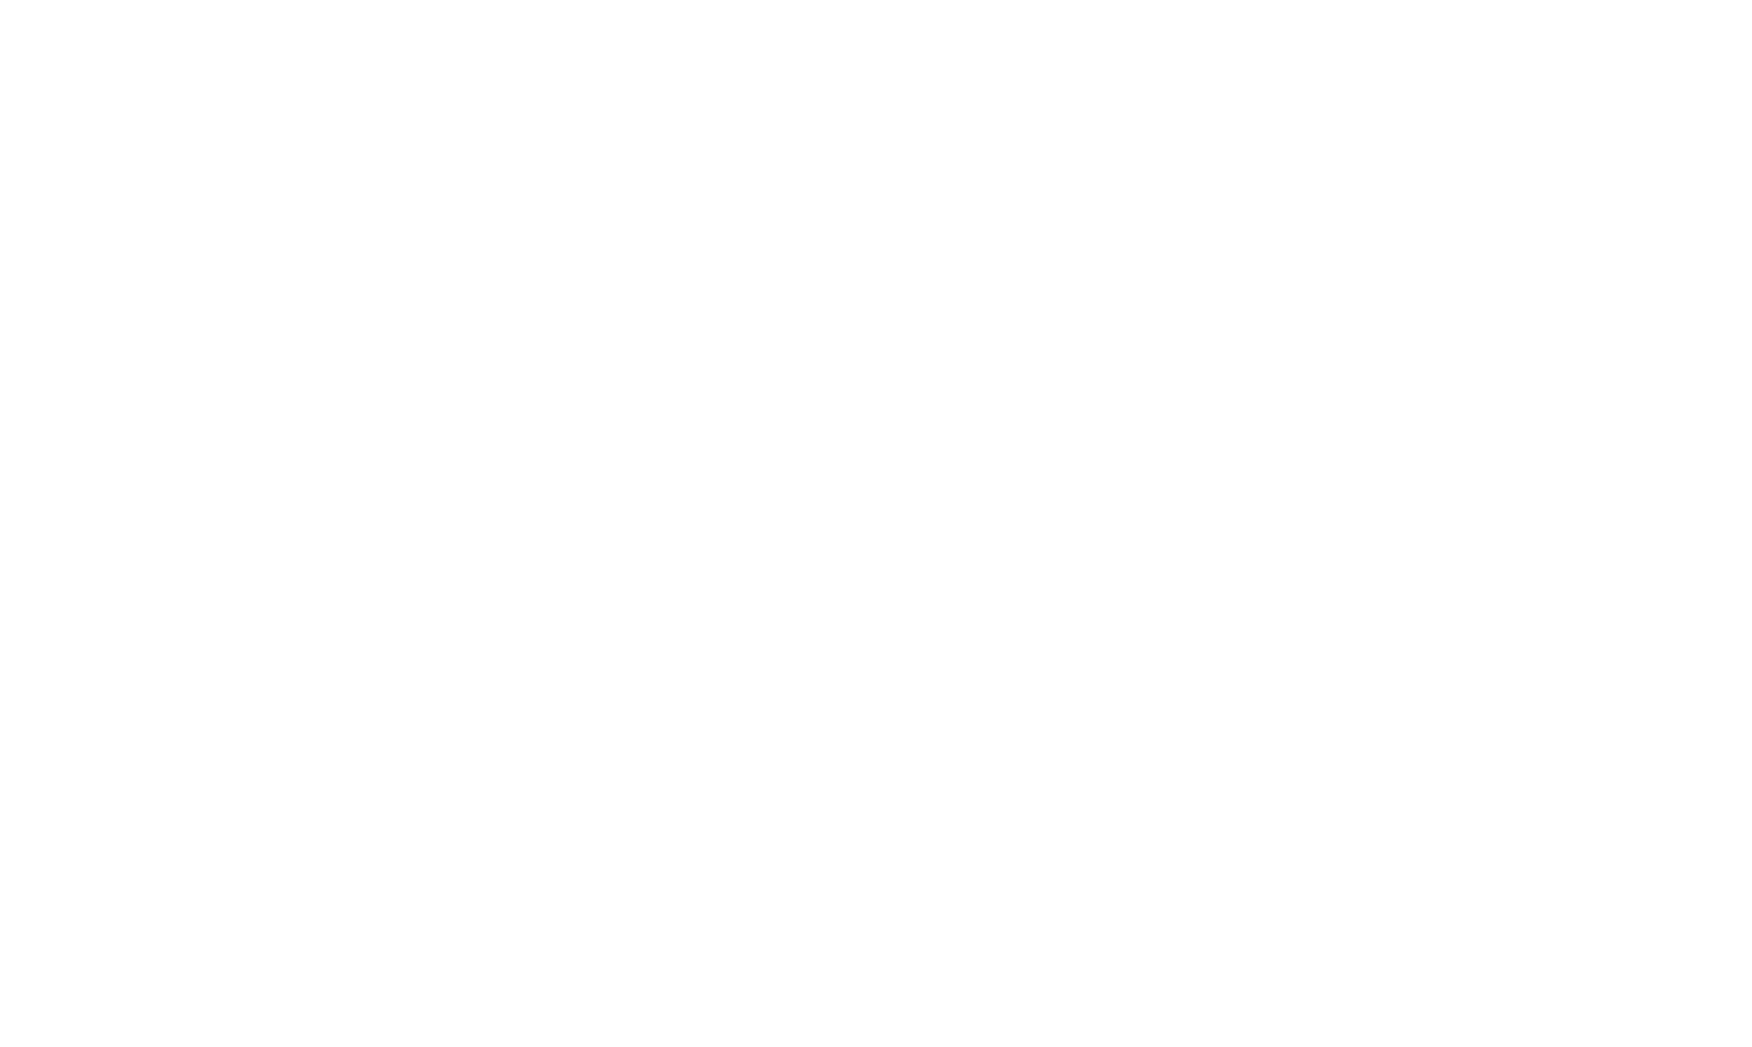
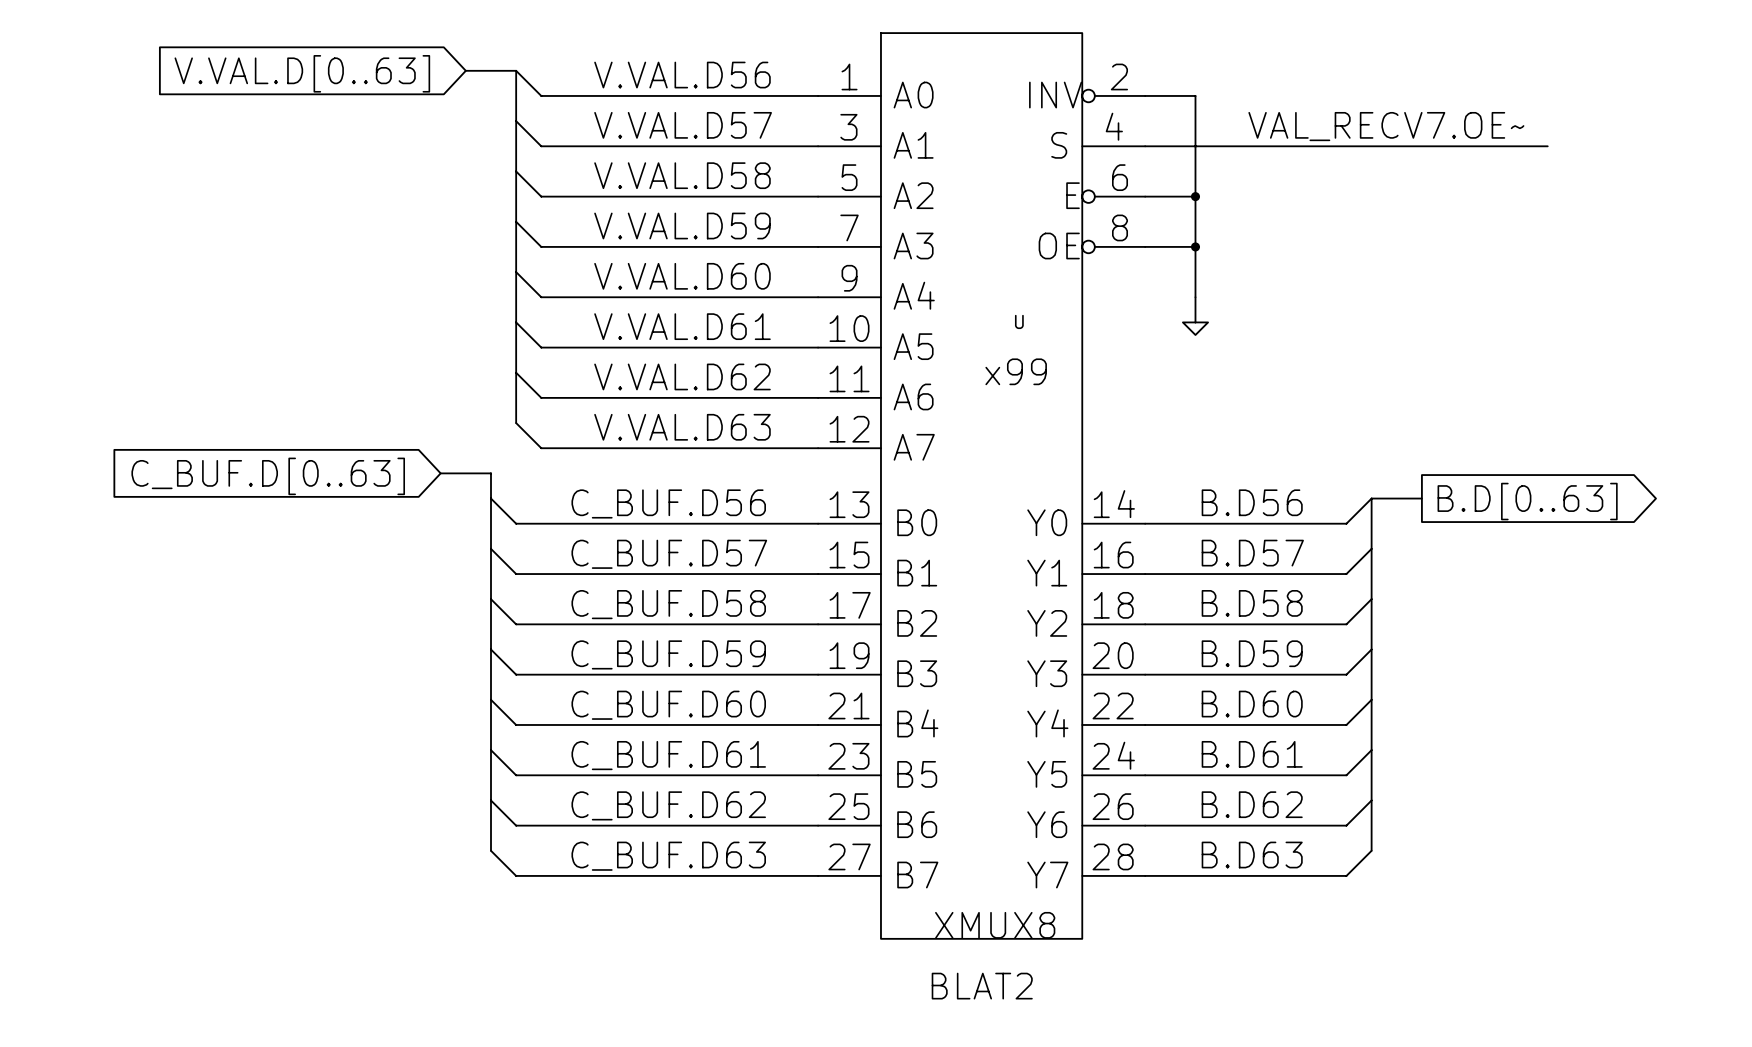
bus: none -> (465, 70) (516, 70) (516, 423)
wire: none -> (516, 70) (541, 95) (818, 95)
global label: none -> V.VAL.D[0..63] (302, 73)
label: none -> V.VAL.D56 (682, 75)
wire: none -> (1145, 95) (1195, 95) (1195, 297)
wire: none -> (516, 121) (541, 146) (818, 146)
label: none -> V.VAL.D57 (683, 125)
label: none -> VAL_RECV7.OE~ (1386, 126)
wire: none -> (1145, 146) (1547, 146)
wire: none -> (516, 171) (541, 196) (818, 196)
label: none -> V.VAL.D58 (682, 175)
wire: none -> (1145, 196) (1195, 196)
junction: none -> (1195, 196)
wire: none -> (516, 221) (541, 246) (818, 246)
label: none -> V.VAL.D59 (682, 226)
wire: none -> (1145, 246) (1195, 246)
junction: none -> (1195, 246)
wire: none -> (516, 272) (541, 297) (818, 297)
label: none -> V.VAL.D60 (682, 276)
power symbol: none -> (1195, 316)
wire: none -> (516, 322) (541, 347) (818, 347)
label: none -> V.VAL.D61 (682, 326)
wire: none -> (516, 372) (541, 397) (818, 397)
label: none -> V.VAL.D62 (682, 376)
wire: none -> (516, 423) (541, 448) (818, 448)
label: none -> V.VAL.D63 (682, 427)
bus: none -> (440, 473) (491, 473) (491, 850)
global label: none -> C_BUF.D[0..63] (268, 476)
U: none -> XMUX8 (981, 485)
wire: none -> (491, 498) (516, 523) (818, 523)
wire: none -> (1371, 498) (1346, 523) (1145, 523)
bus: none -> (1421, 498) (1371, 498) (1371, 850)
global label: none -> B.D[0..63] (1527, 501)
label: none -> B.D56 (1252, 502)
label: none -> C_BUF.D56 (668, 503)
wire: none -> (491, 548) (516, 574) (818, 574)
wire: none -> (1371, 548) (1346, 574) (1145, 574)
label: none -> B.D57 (1252, 553)
label: none -> C_BUF.D57 (669, 554)
wire: none -> (491, 599) (516, 624) (818, 624)
wire: none -> (1371, 599) (1346, 624) (1145, 624)
label: none -> B.D58 (1252, 603)
label: none -> C_BUF.D58 (668, 604)
wire: none -> (491, 649) (516, 674) (818, 674)
wire: none -> (1371, 649) (1346, 674) (1145, 674)
label: none -> B.D59 (1252, 653)
label: none -> C_BUF.D59 (668, 654)
wire: none -> (491, 699) (516, 724) (818, 724)
wire: none -> (1371, 699) (1346, 724) (1145, 724)
label: none -> B.D60 (1252, 704)
label: none -> C_BUF.D60 (668, 705)
wire: none -> (491, 750) (516, 775) (818, 775)
wire: none -> (1371, 750) (1346, 775) (1145, 775)
label: none -> B.D61 (1252, 754)
label: none -> C_BUF.D61 (668, 755)
wire: none -> (491, 800) (516, 825) (818, 825)
wire: none -> (1371, 800) (1346, 825) (1145, 825)
label: none -> B.D62 (1252, 804)
label: none -> C_BUF.D62 (668, 805)
wire: none -> (491, 850) (516, 875) (818, 875)
wire: none -> (1371, 850) (1346, 875) (1145, 875)
label: none -> B.D63 (1252, 855)
label: none -> C_BUF.D63 (668, 856)

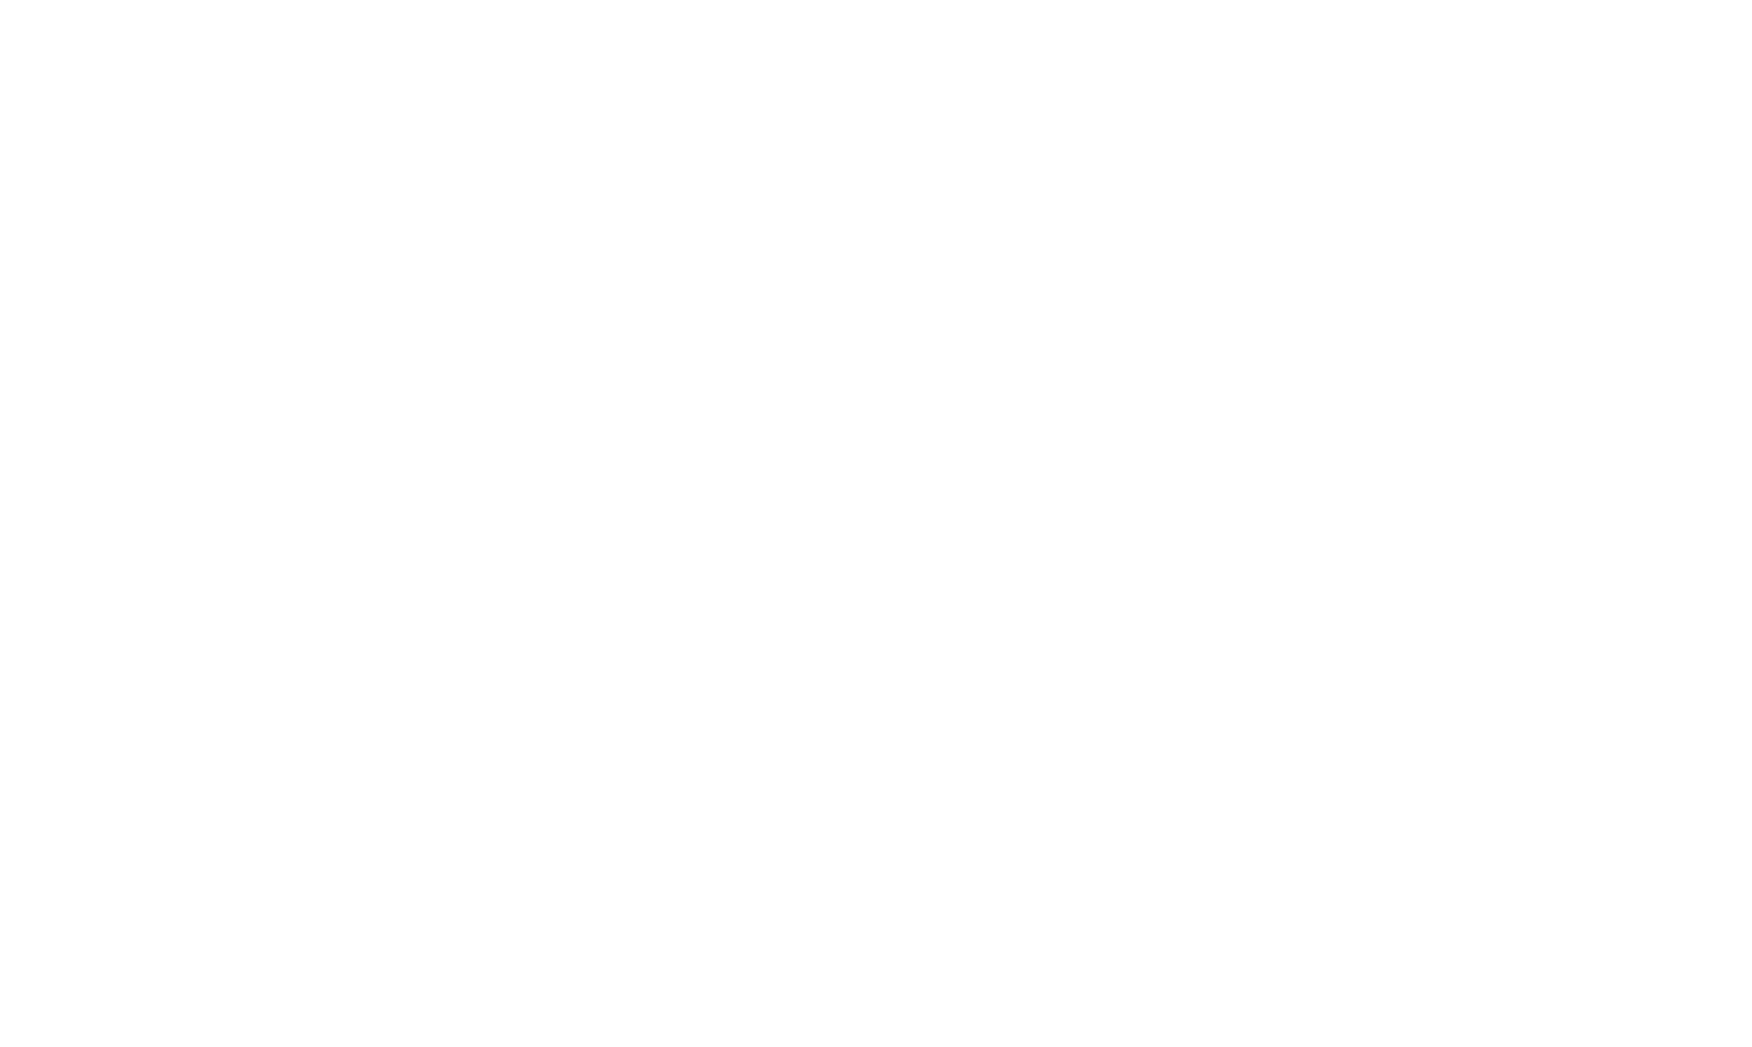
bus: (465, 70) (516, 70) (516, 423) -> none
wire: (516, 70) (541, 95) (818, 95) -> none
global label: V.VAL.D[0..63] (302, 73) -> none
label: V.VAL.D56 (682, 75) -> none
wire: (1145, 95) (1195, 95) (1195, 297) -> none
wire: (516, 121) (541, 146) (818, 146) -> none
label: V.VAL.D57 (683, 125) -> none
label: VAL_RECV7.OE~ (1386, 126) -> none
wire: (1145, 146) (1547, 146) -> none
wire: (516, 171) (541, 196) (818, 196) -> none
label: V.VAL.D58 (682, 175) -> none
wire: (1145, 196) (1195, 196) -> none
junction: (1195, 196) -> none
wire: (516, 221) (541, 246) (818, 246) -> none
label: V.VAL.D59 (682, 226) -> none
wire: (1145, 246) (1195, 246) -> none
junction: (1195, 246) -> none
wire: (516, 272) (541, 297) (818, 297) -> none
label: V.VAL.D60 (682, 276) -> none
power symbol: (1195, 316) -> none
wire: (516, 322) (541, 347) (818, 347) -> none
label: V.VAL.D61 (682, 326) -> none
wire: (516, 372) (541, 397) (818, 397) -> none
label: V.VAL.D62 (682, 376) -> none
wire: (516, 423) (541, 448) (818, 448) -> none
label: V.VAL.D63 (682, 427) -> none
bus: (440, 473) (491, 473) (491, 850) -> none
global label: C_BUF.D[0..63] (268, 476) -> none
U: XMUX8 (981, 485) -> none
wire: (491, 498) (516, 523) (818, 523) -> none
wire: (1371, 498) (1346, 523) (1145, 523) -> none
bus: (1421, 498) (1371, 498) (1371, 850) -> none
global label: B.D[0..63] (1527, 501) -> none
label: B.D56 (1252, 502) -> none
label: C_BUF.D56 (668, 503) -> none
wire: (491, 548) (516, 574) (818, 574) -> none
wire: (1371, 548) (1346, 574) (1145, 574) -> none
label: B.D57 (1252, 553) -> none
label: C_BUF.D57 (669, 554) -> none
wire: (491, 599) (516, 624) (818, 624) -> none
wire: (1371, 599) (1346, 624) (1145, 624) -> none
label: B.D58 (1252, 603) -> none
label: C_BUF.D58 (668, 604) -> none
wire: (491, 649) (516, 674) (818, 674) -> none
wire: (1371, 649) (1346, 674) (1145, 674) -> none
label: B.D59 (1252, 653) -> none
label: C_BUF.D59 (668, 654) -> none
wire: (491, 699) (516, 724) (818, 724) -> none
wire: (1371, 699) (1346, 724) (1145, 724) -> none
label: B.D60 (1252, 704) -> none
label: C_BUF.D60 (668, 705) -> none
wire: (491, 750) (516, 775) (818, 775) -> none
wire: (1371, 750) (1346, 775) (1145, 775) -> none
label: B.D61 (1252, 754) -> none
label: C_BUF.D61 (668, 755) -> none
wire: (491, 800) (516, 825) (818, 825) -> none
wire: (1371, 800) (1346, 825) (1145, 825) -> none
label: B.D62 (1252, 804) -> none
label: C_BUF.D62 (668, 805) -> none
wire: (491, 850) (516, 875) (818, 875) -> none
wire: (1371, 850) (1346, 875) (1145, 875) -> none
label: B.D63 (1252, 855) -> none
label: C_BUF.D63 (668, 856) -> none

